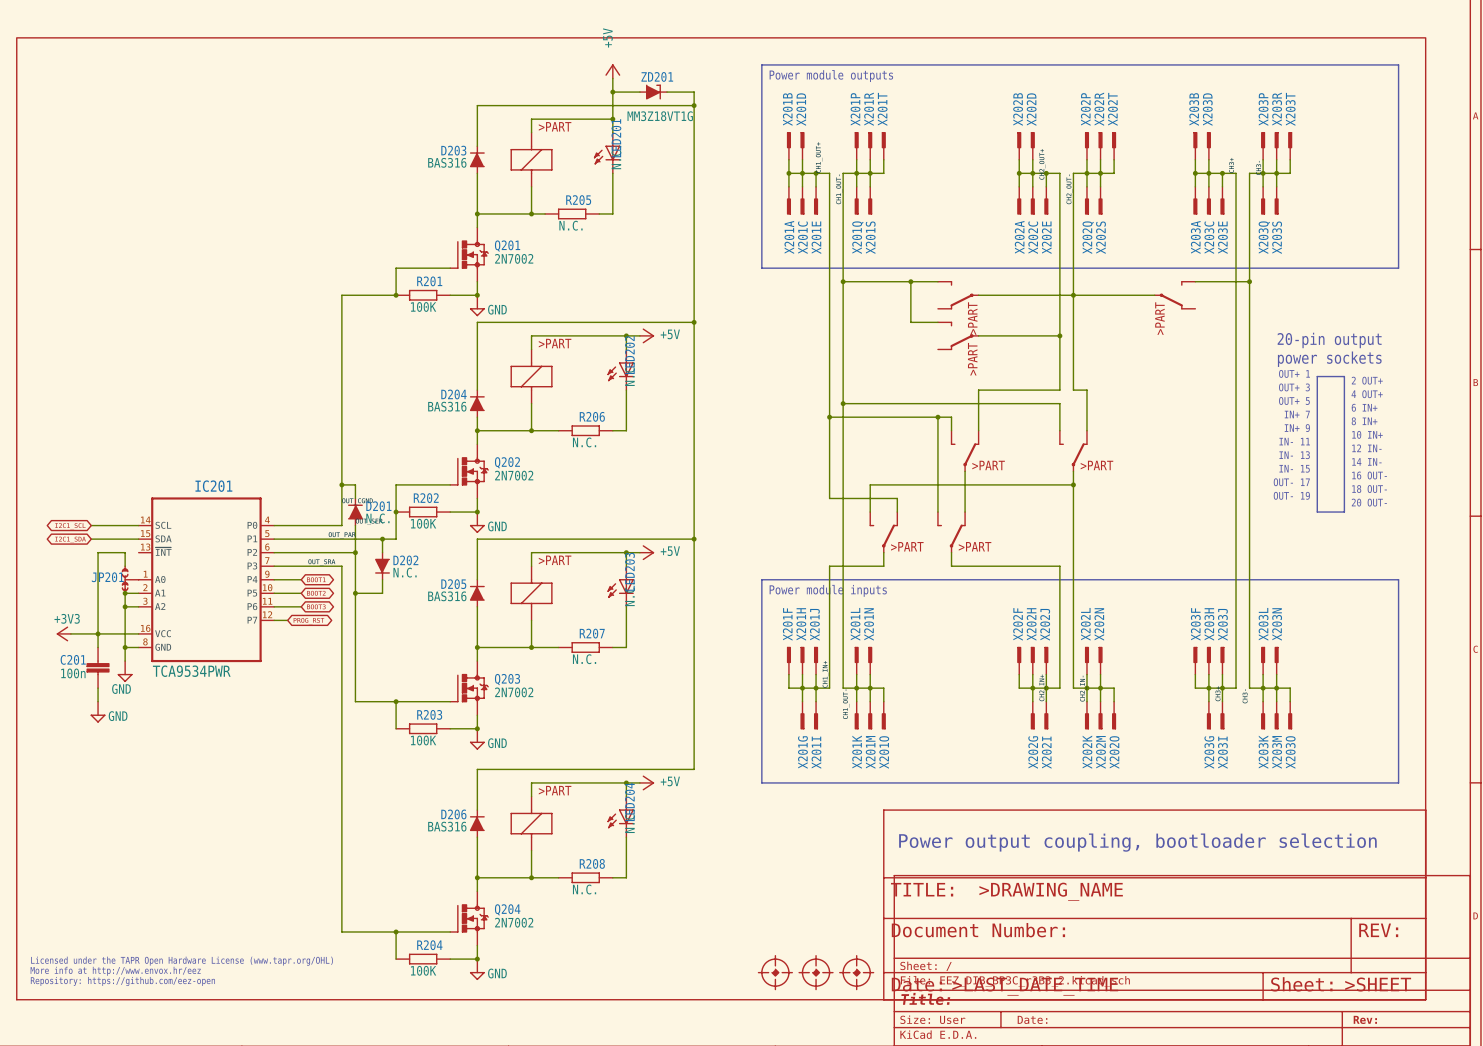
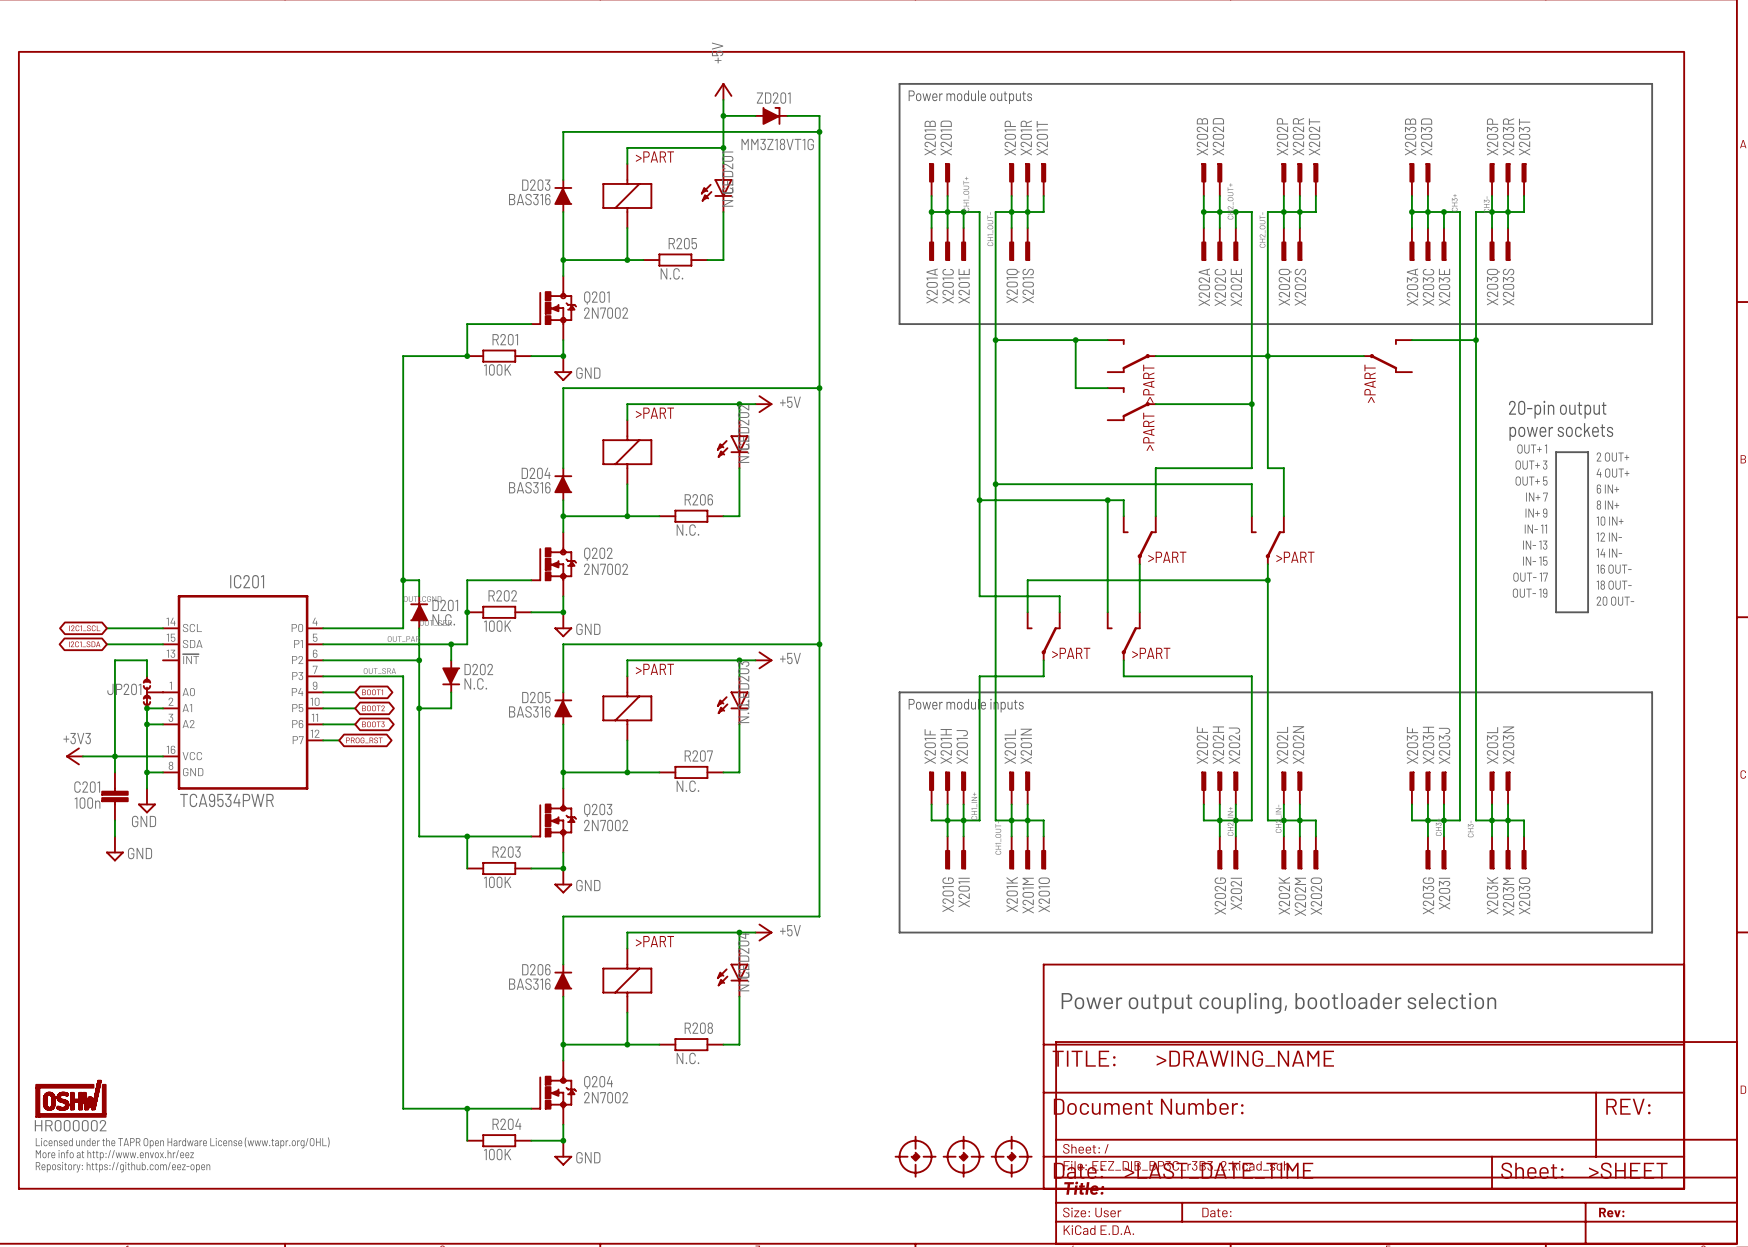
part: none -> HR000002 (70, 1098)

